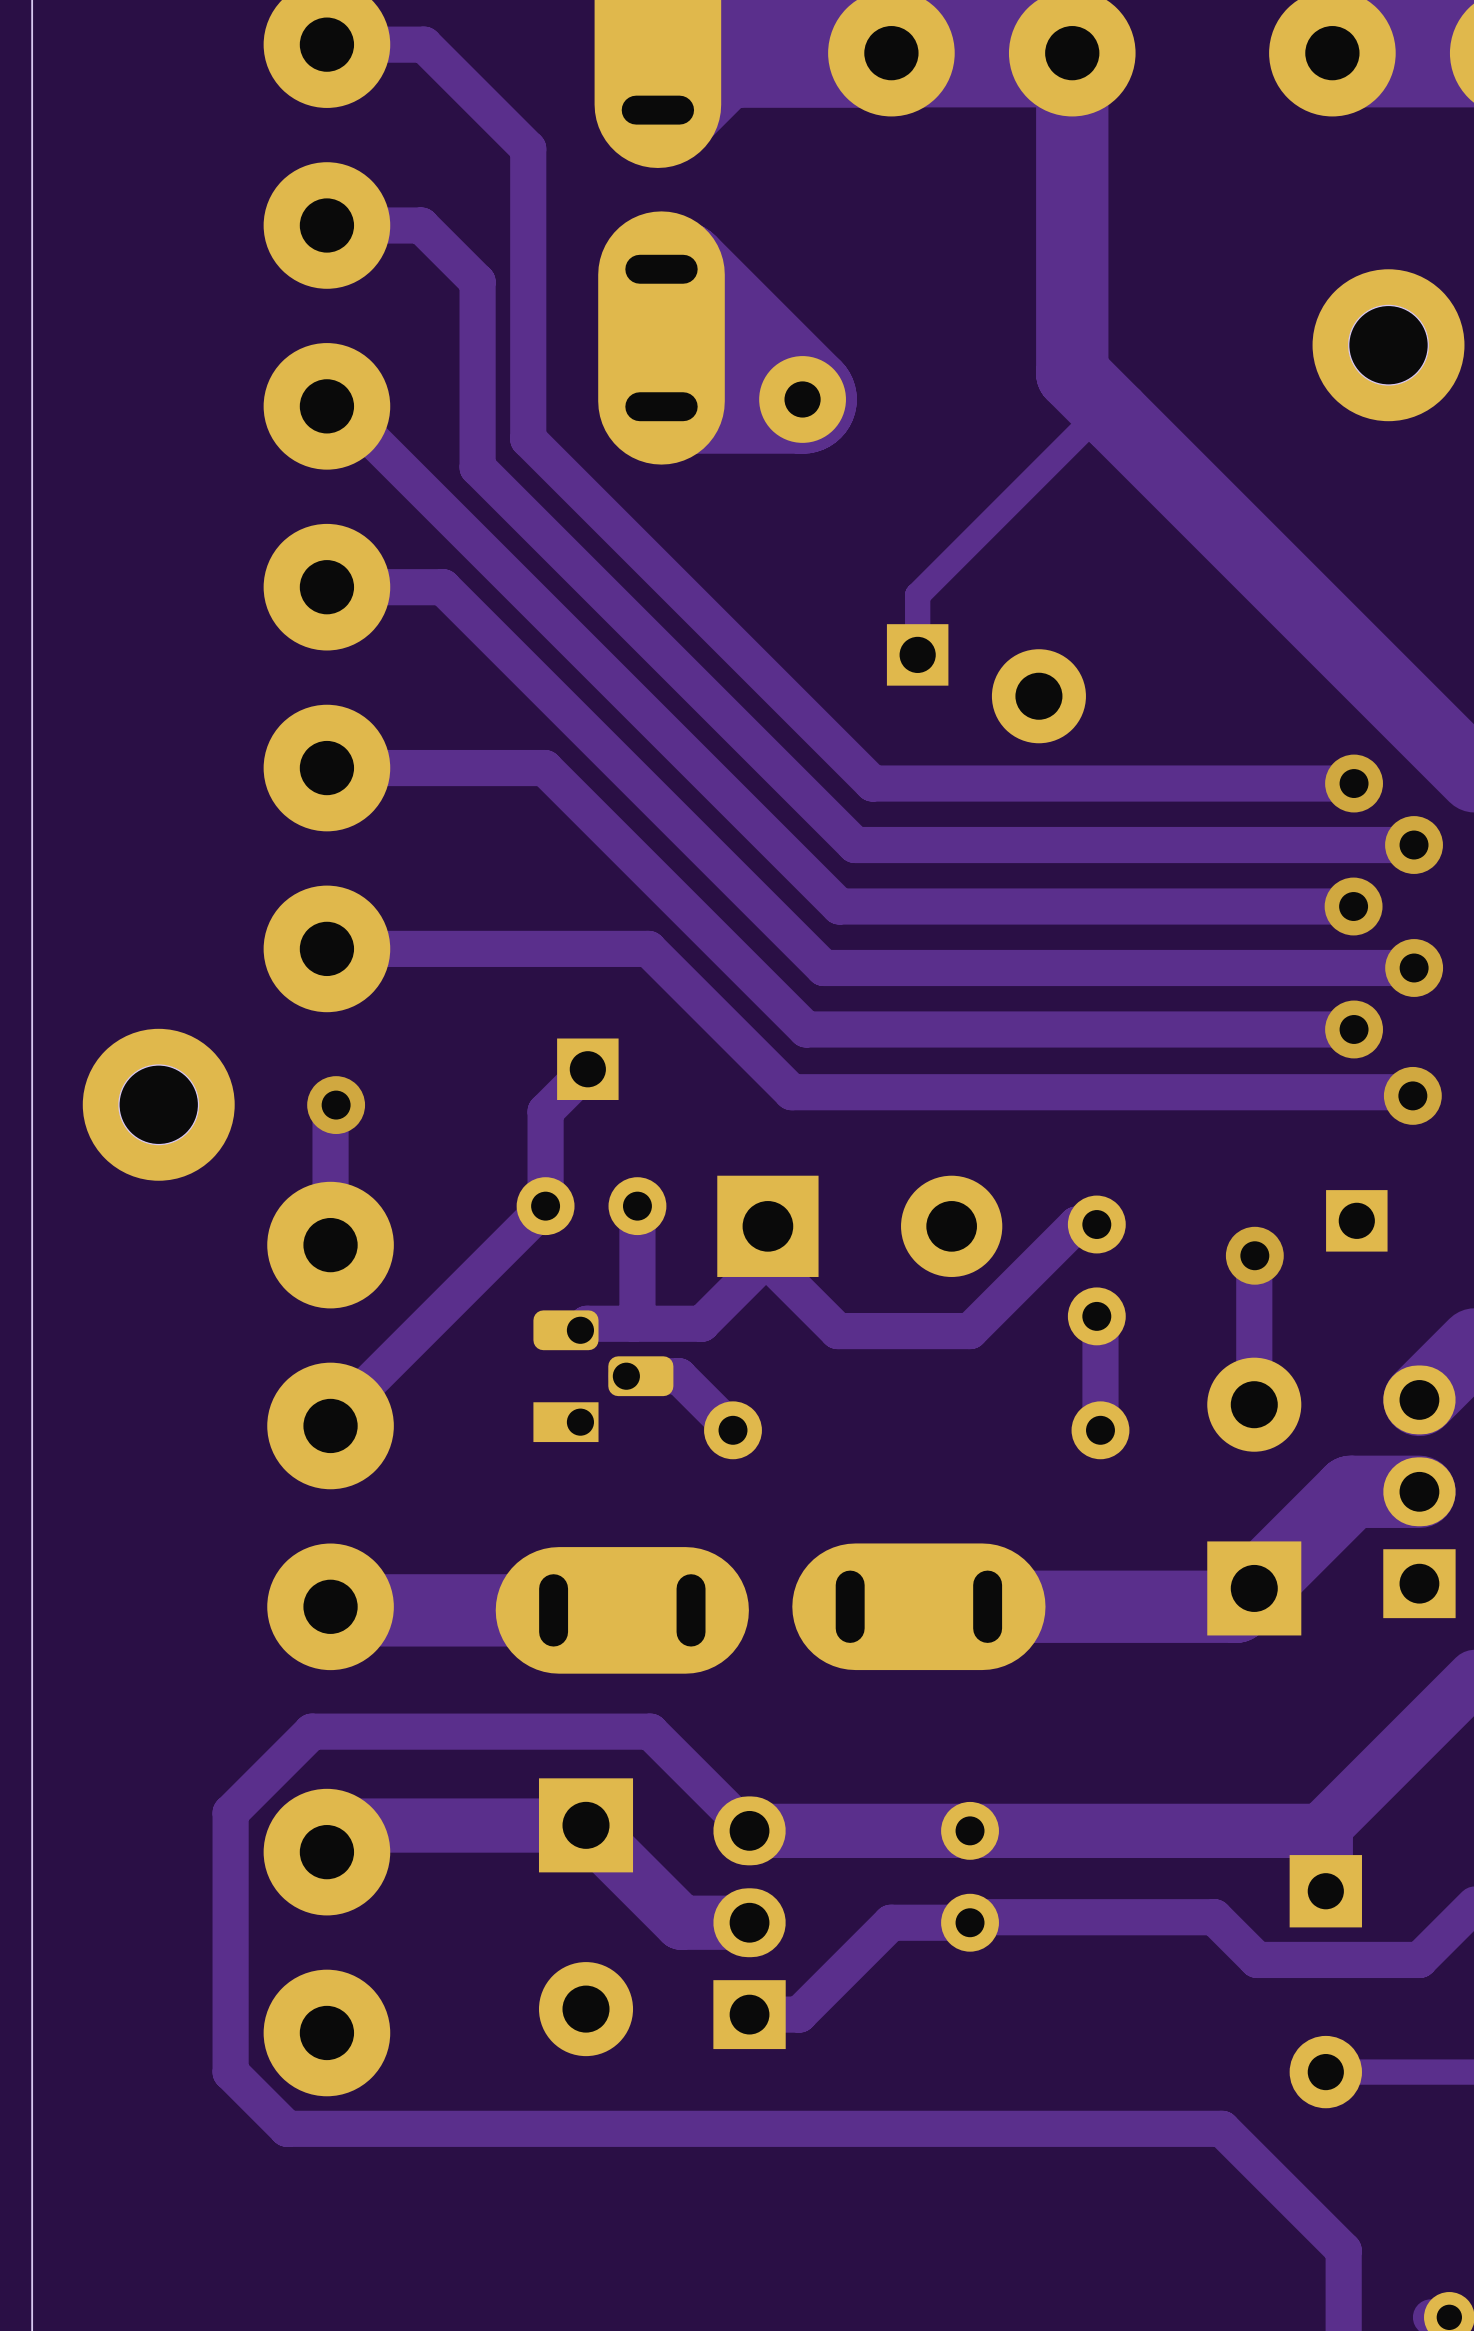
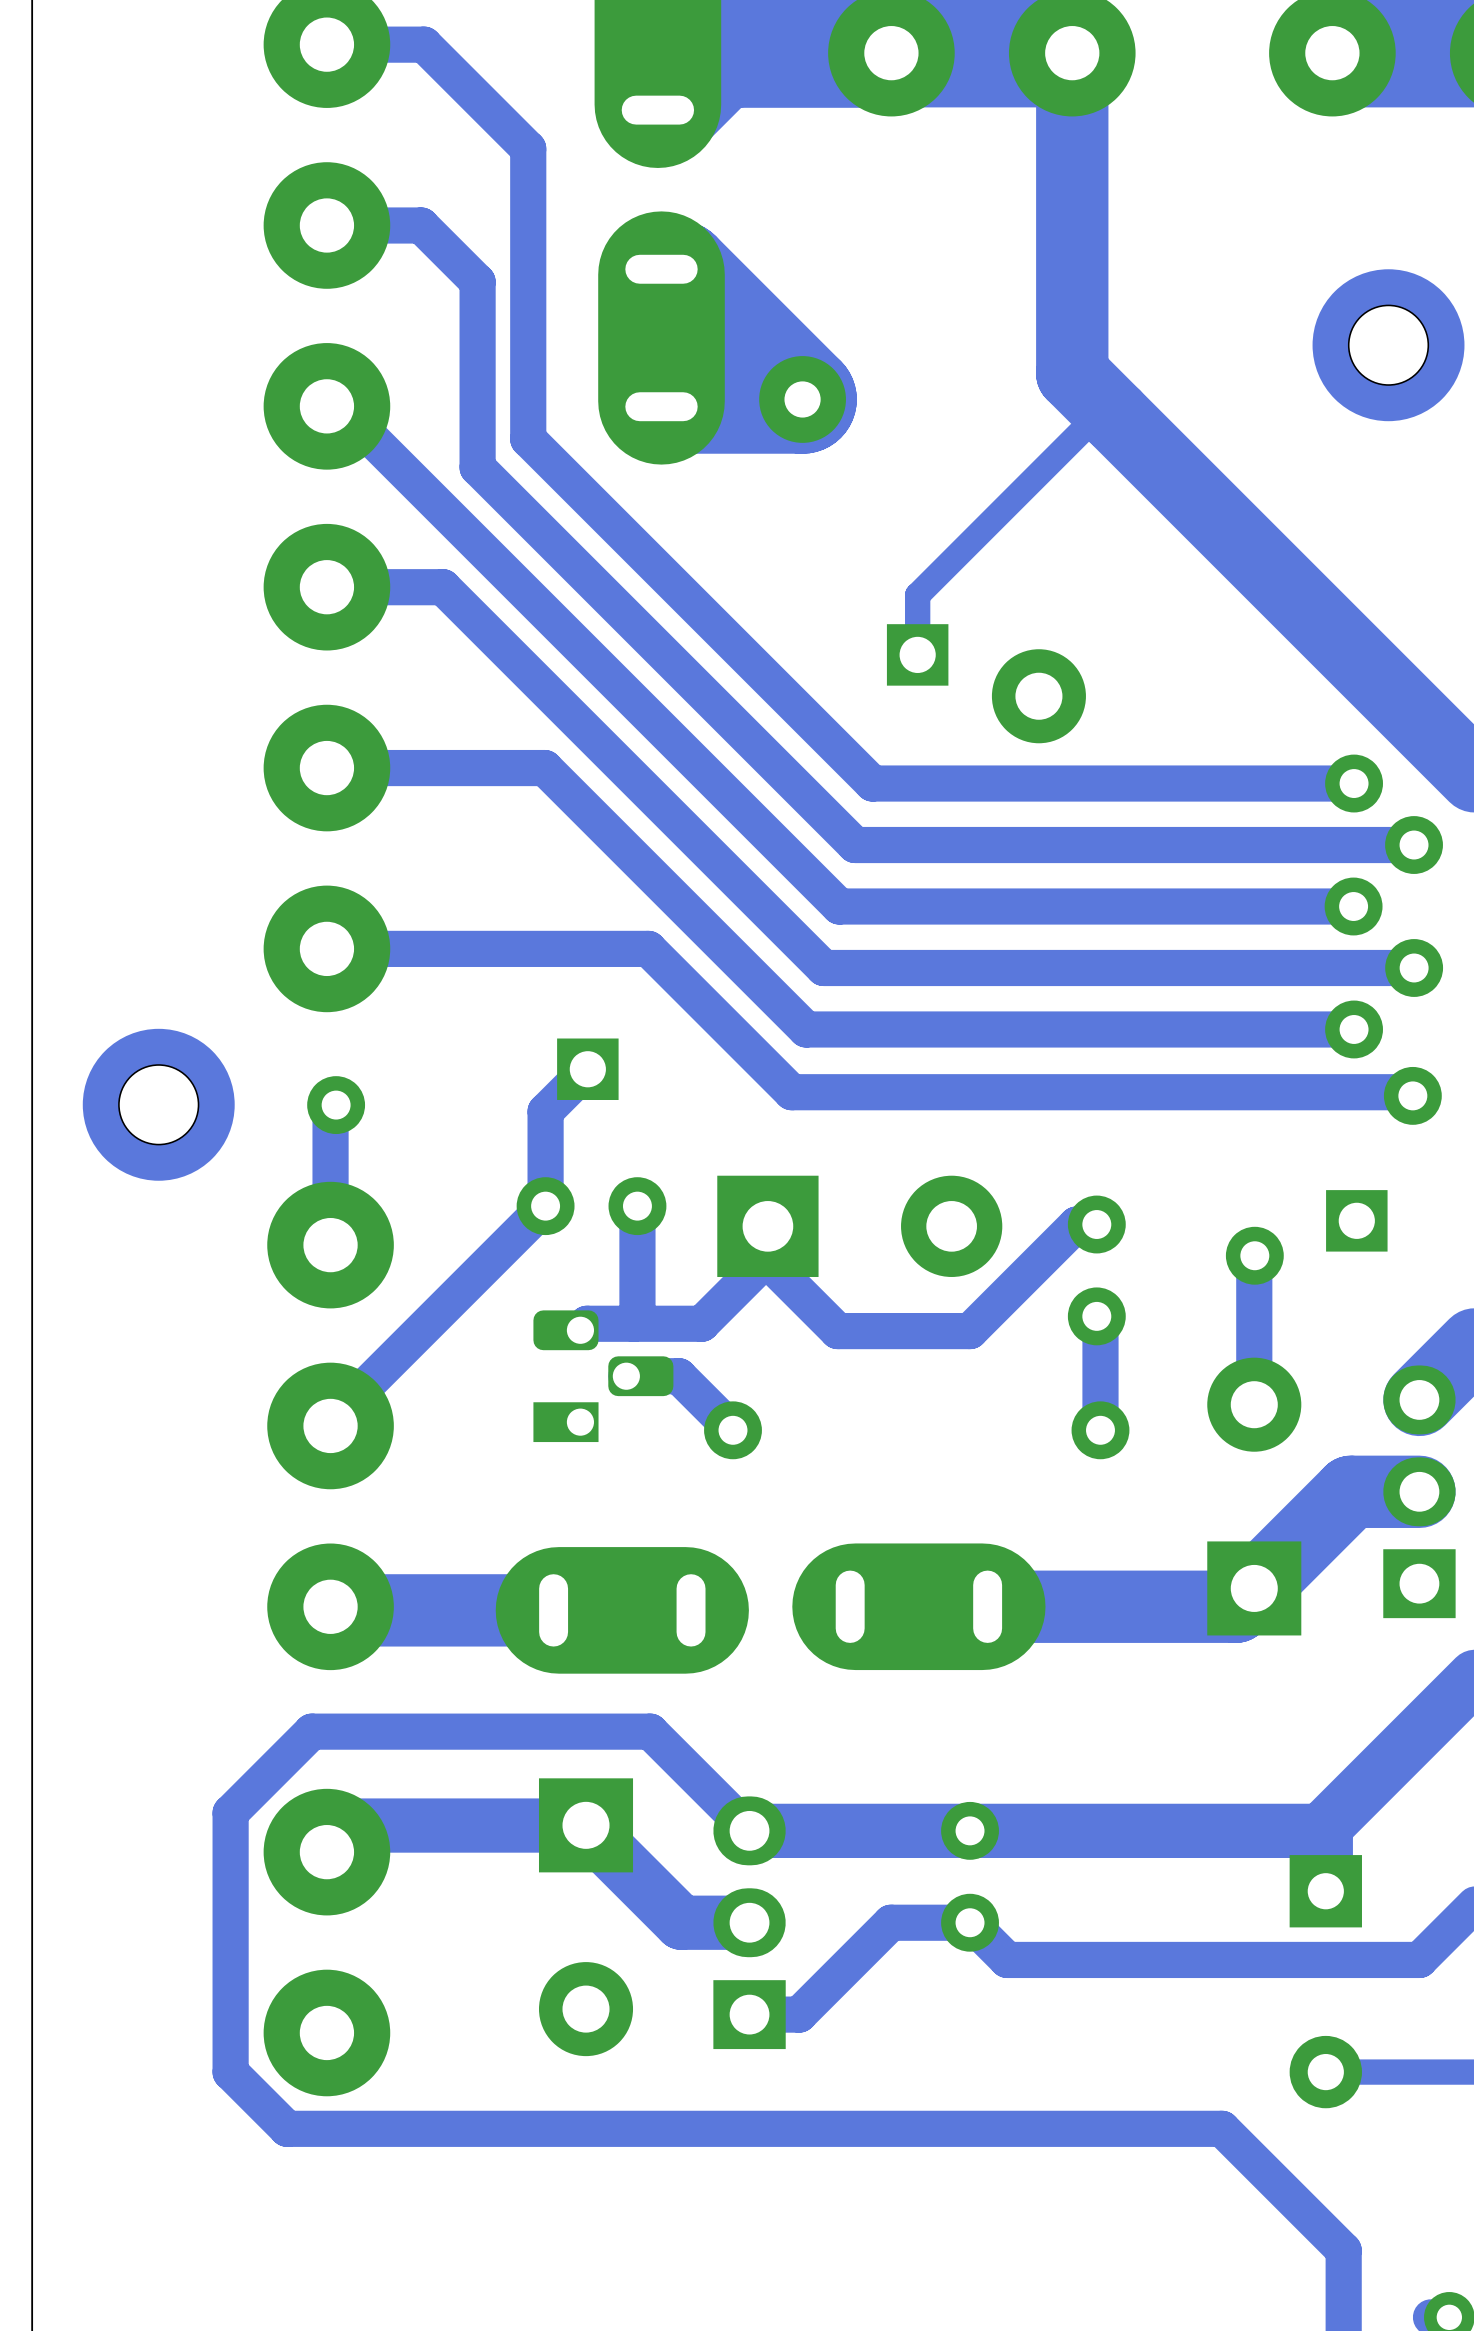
track: (970, 1922) (975, 1917) (1214, 1917) (1257, 1959) -> (970, 1922) (1007, 1959) (1257, 1959)

